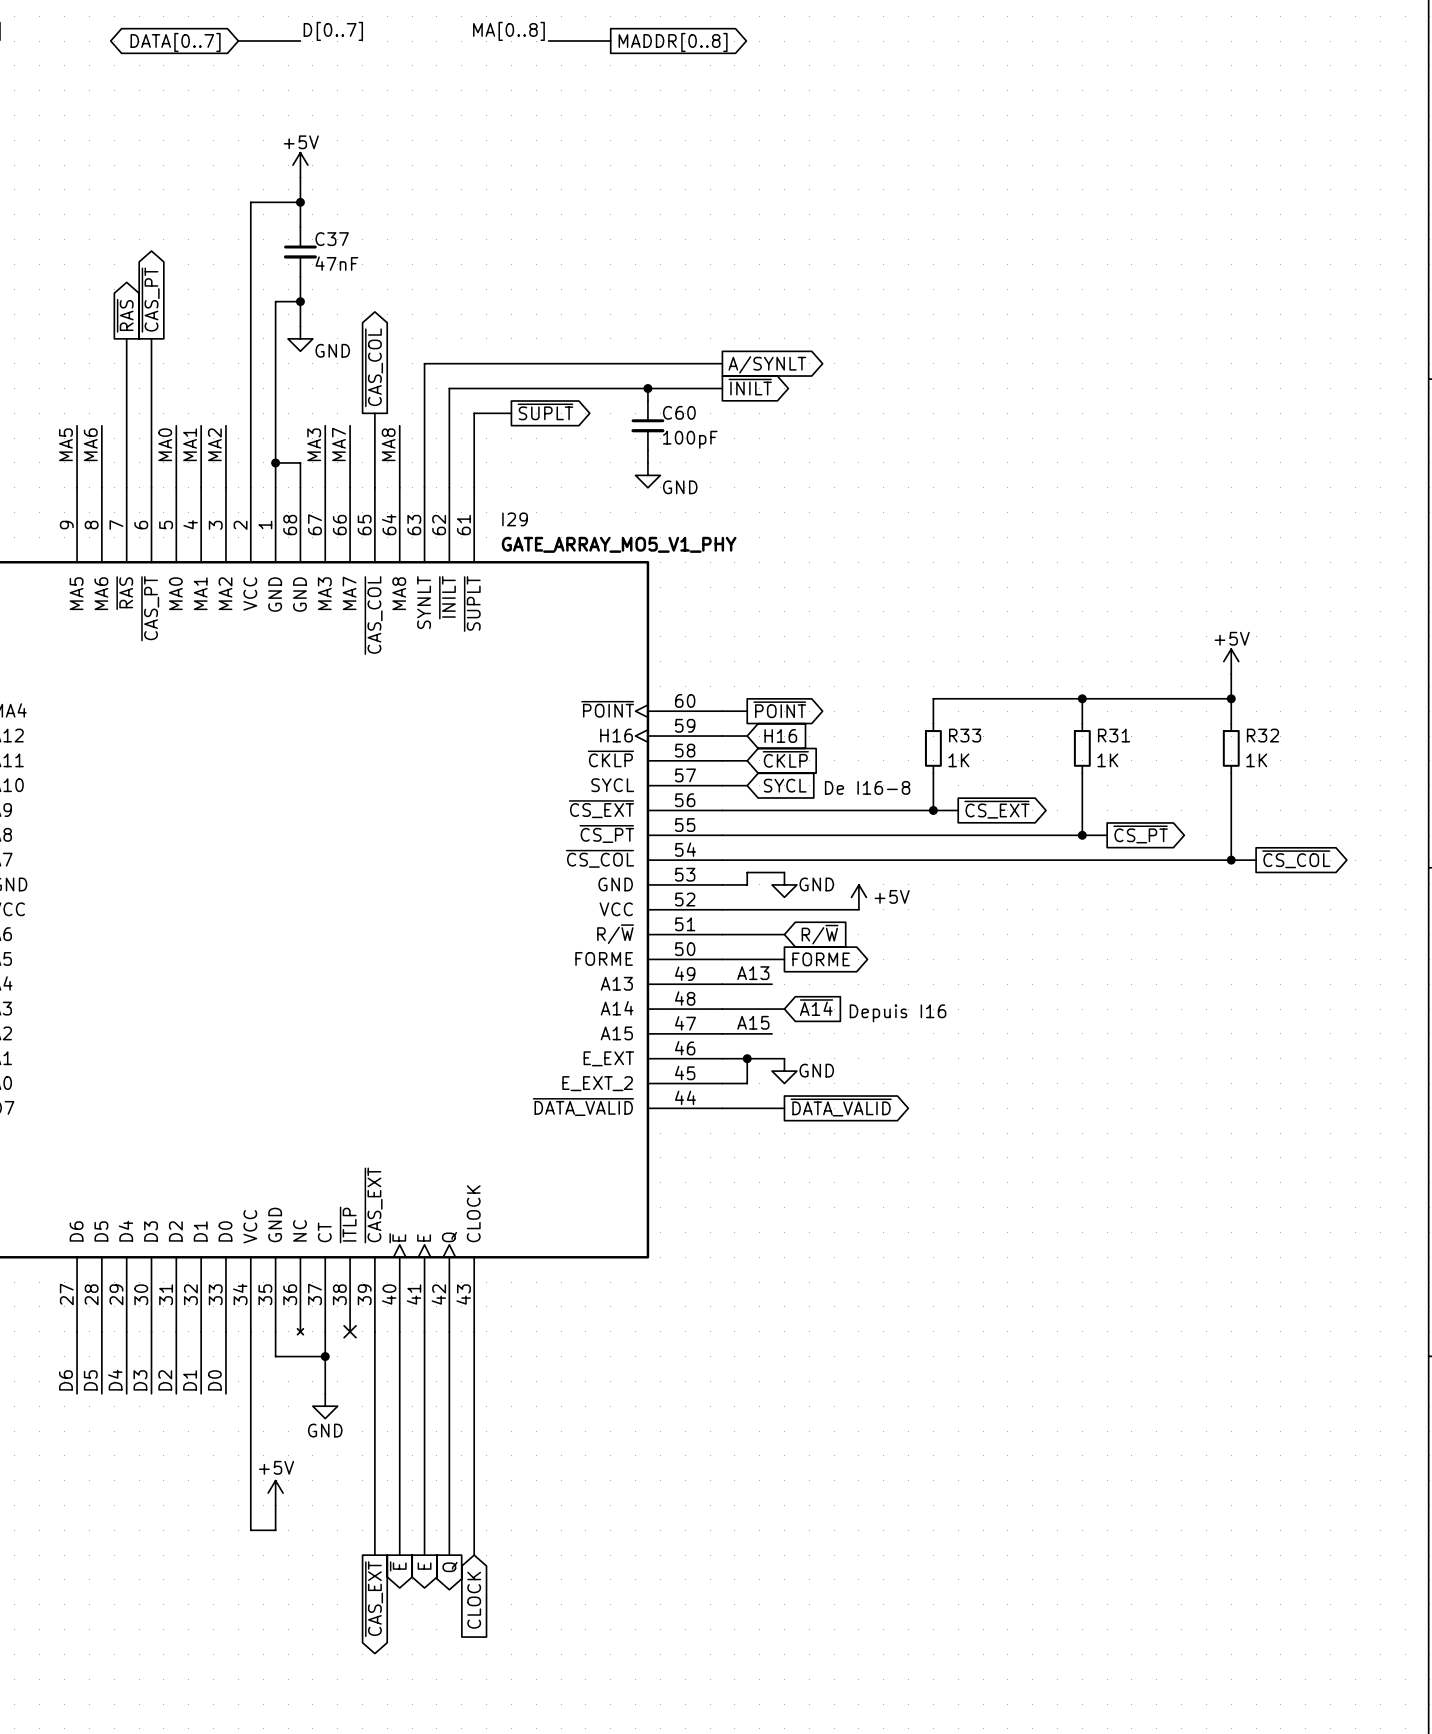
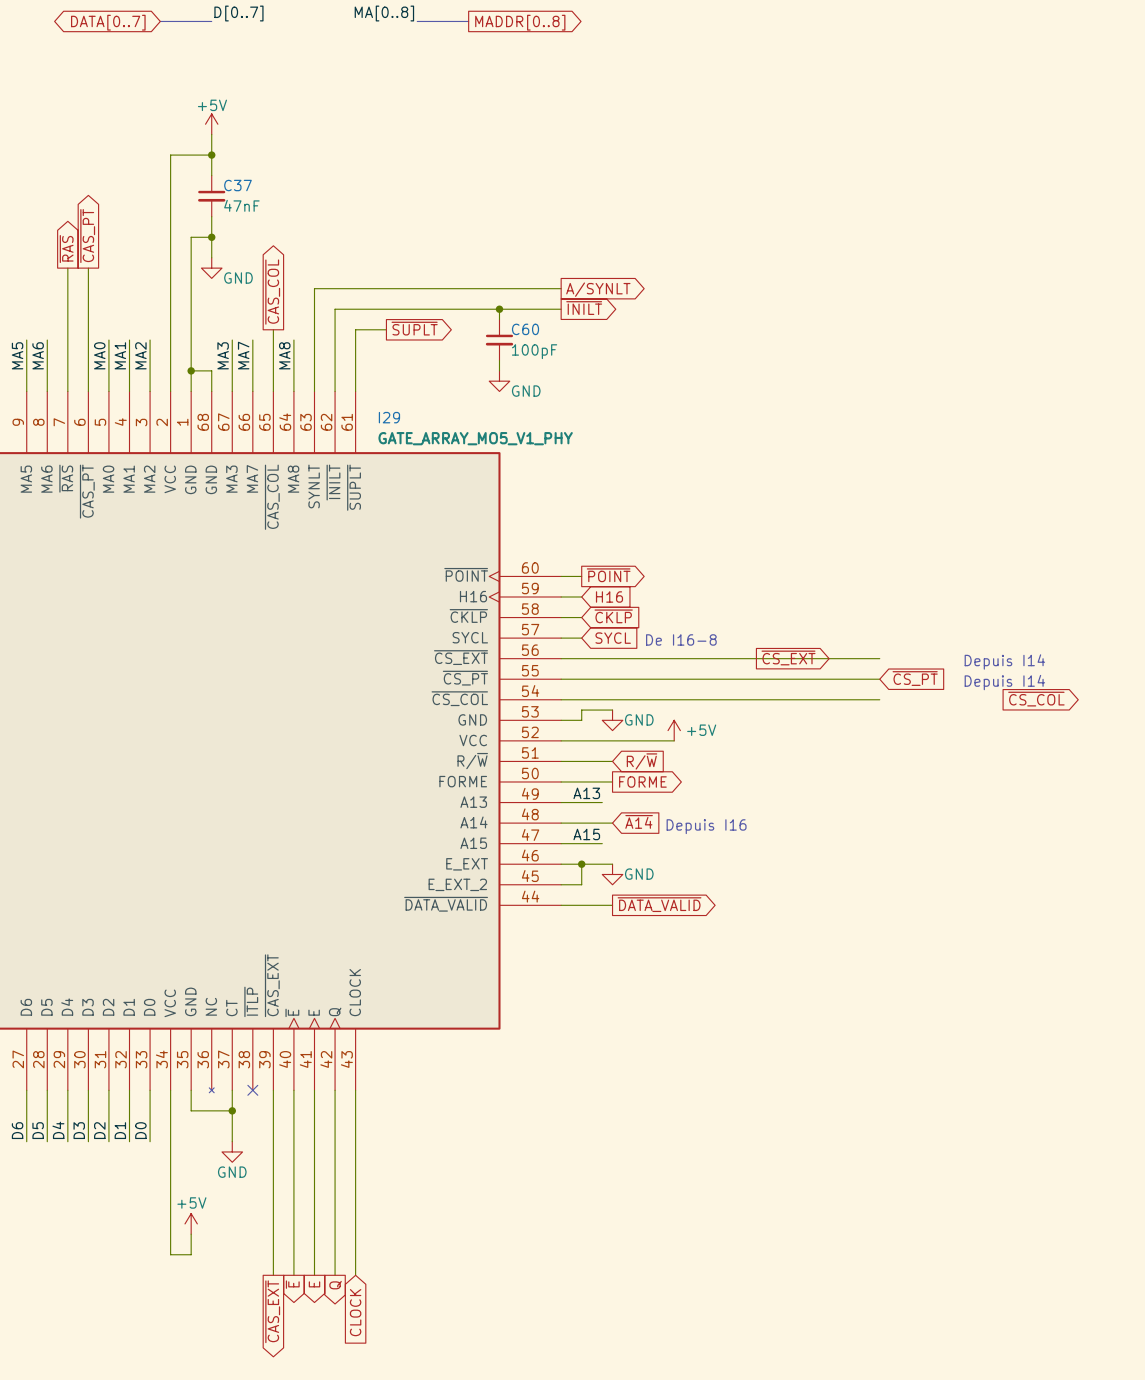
power symbol: +5V (1231, 661) -> none
wire: (1231, 673) (1231, 723) -> none
wire: (1082, 698) (1082, 723) -> none
junction: (1082, 698) -> none
wire: (1231, 698) (933, 698) (933, 723) -> none
junction: (1231, 698) -> none
R33: 1K (933, 748) -> none
R31: 1K (1082, 748) -> none
R32: 1K (1231, 748) -> none
wire: (933, 773) (933, 810) -> none
wire: (1082, 773) (1082, 835) -> none
wire: (1231, 773) (1231, 860) -> none
junction: (933, 810) -> none
text: none -> Depuis I14 (1004, 661)
global label shape: output (1140, 834) -> input (915, 678)
junction: (1082, 835) -> none
text: none -> Depuis I14 (1004, 682)
wire: (1107, 860) (1256, 860) -> (756, 658) (879, 658)
junction: (1231, 860) -> none

